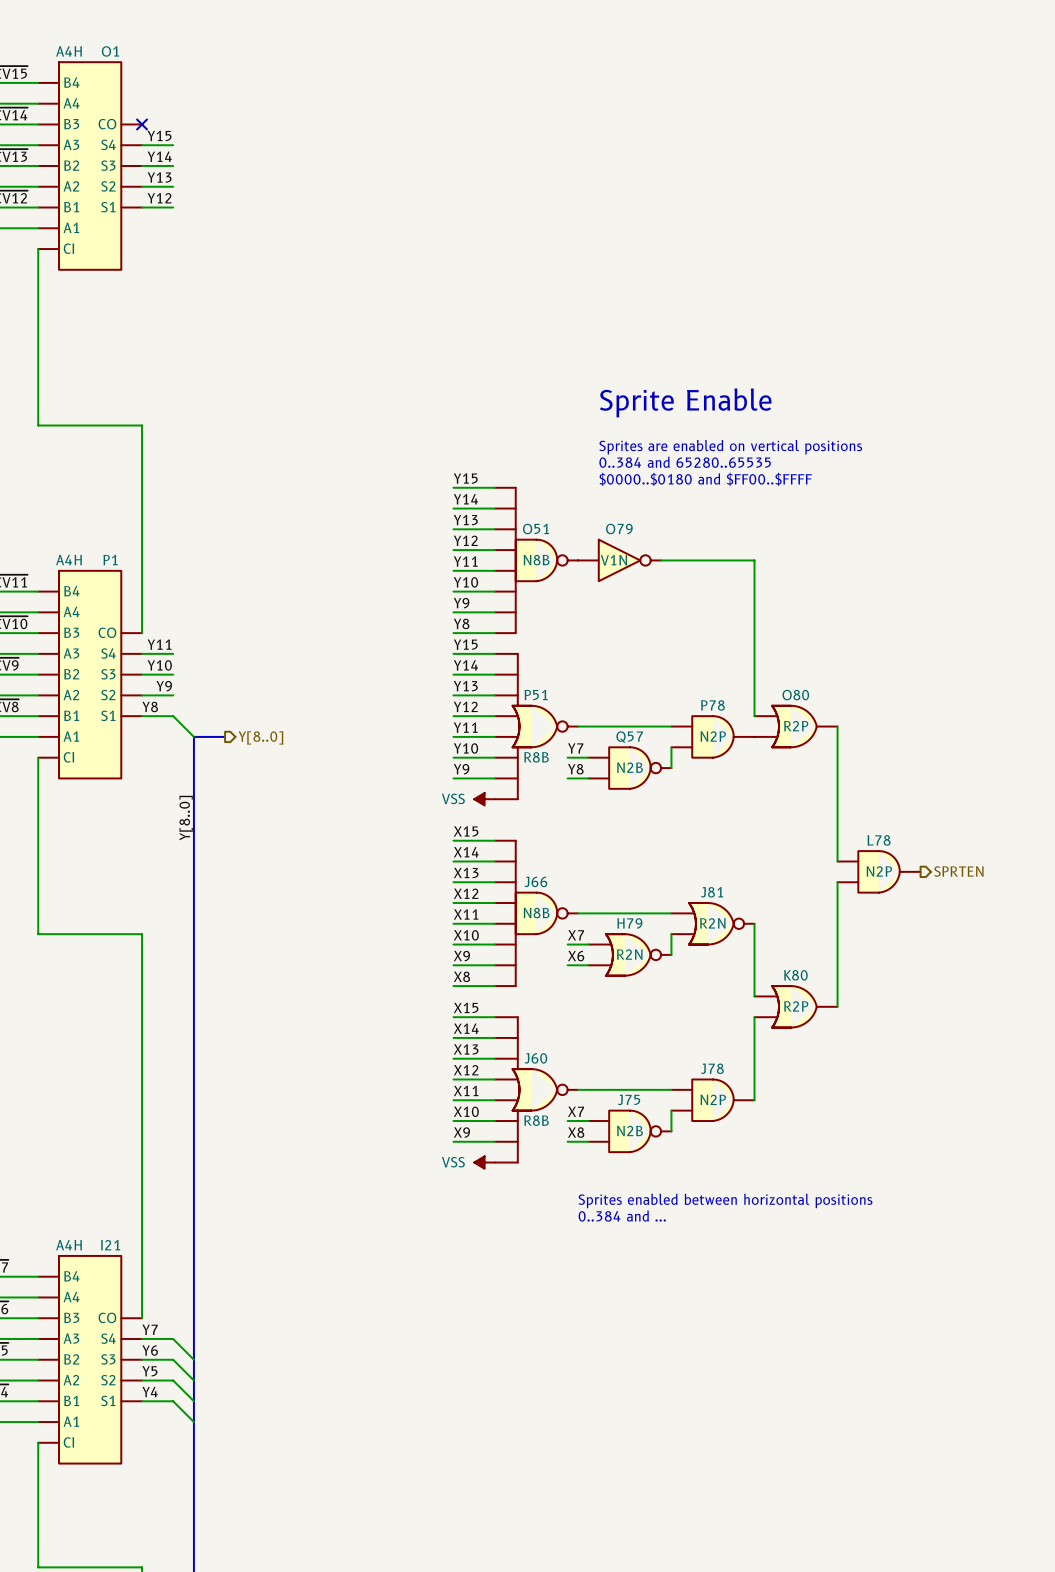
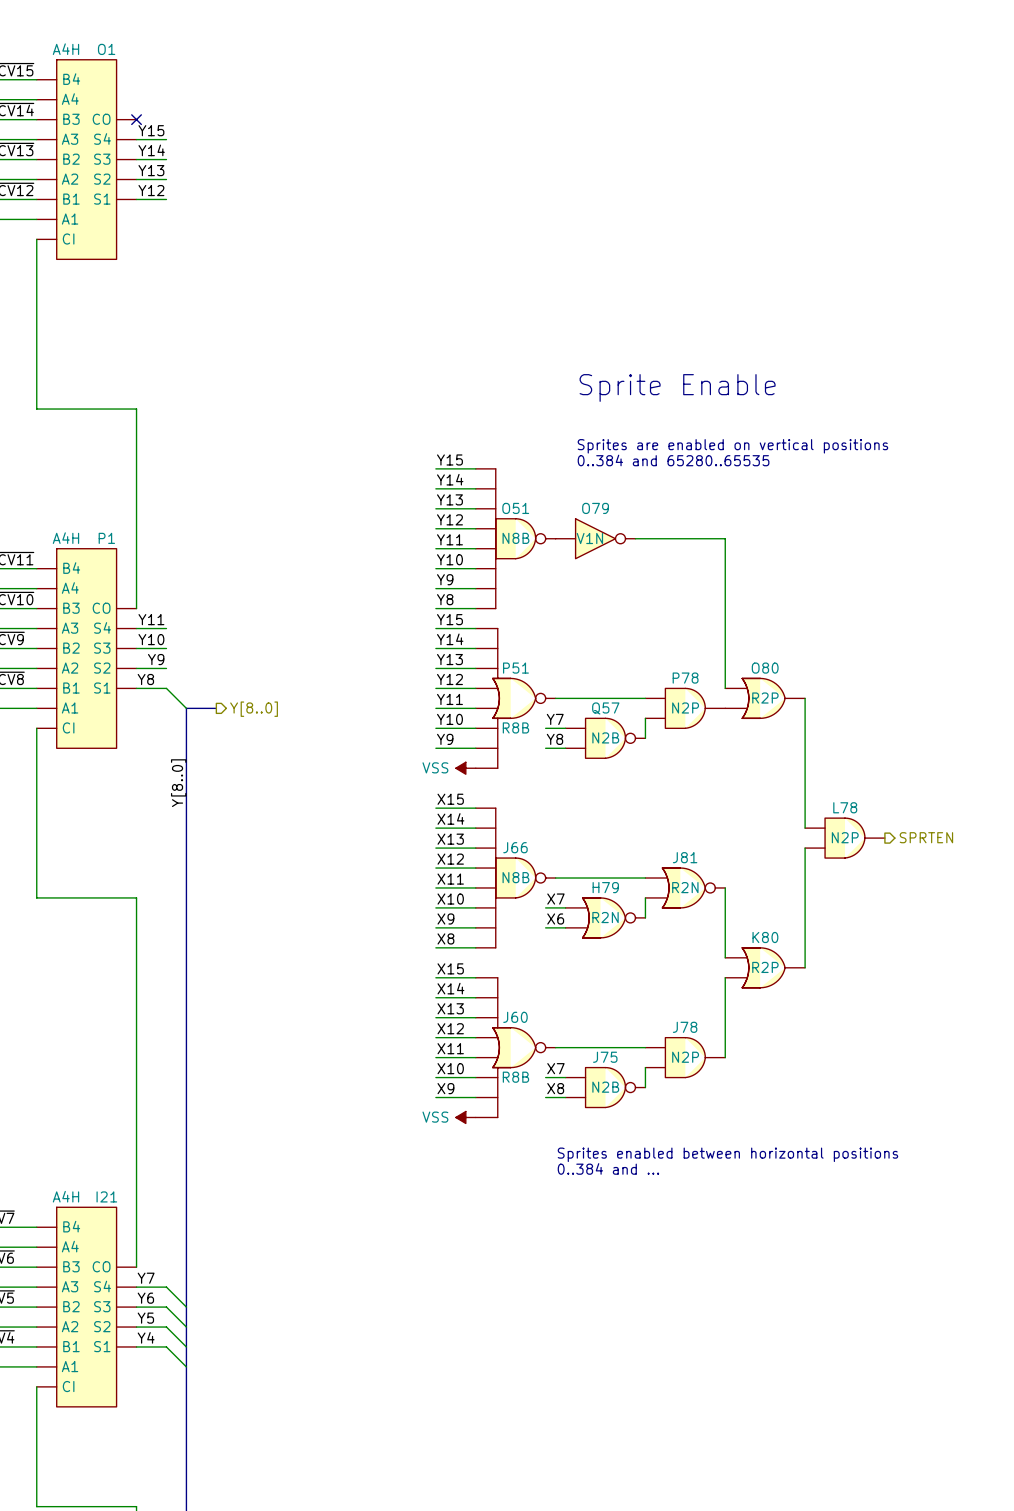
text: Sprites are enabled on vertical positions (730, 447) -> none
text: 0..384 and 65280..65535 (685, 462) -> Sprites are enabled on vertical positions (732, 446)
text: $0000..$0180 and $FF00..$FFFF (705, 479) -> 0..384 and 65280..65535 (673, 460)

